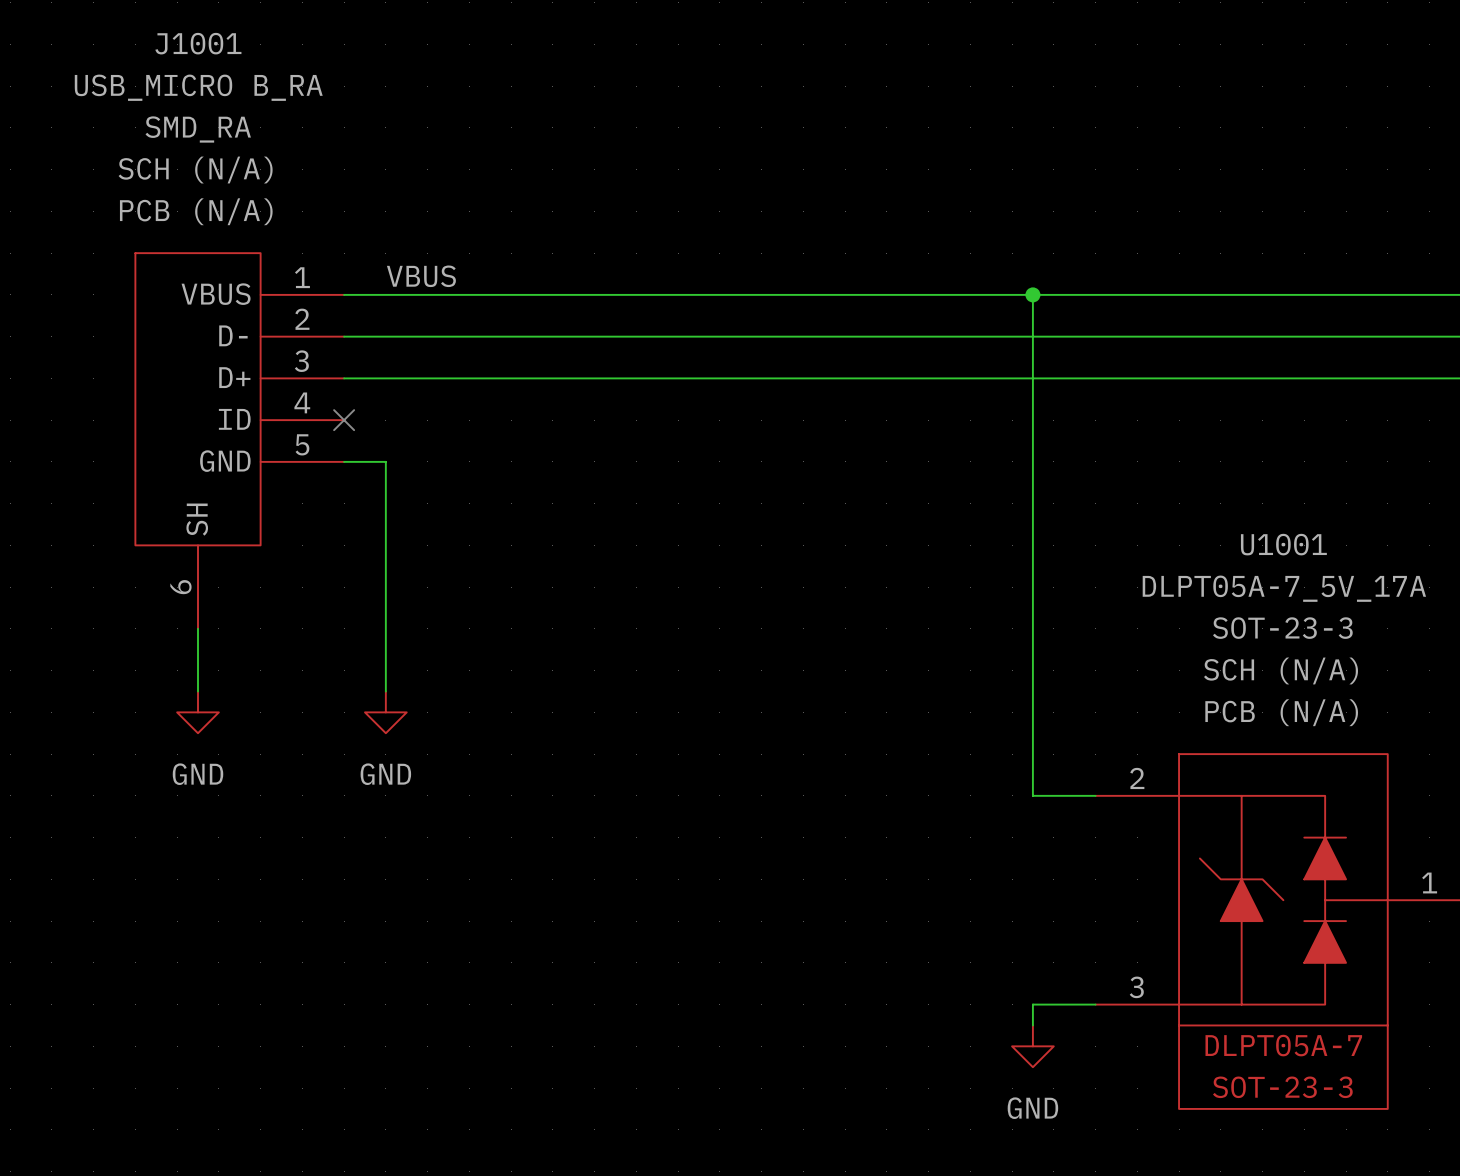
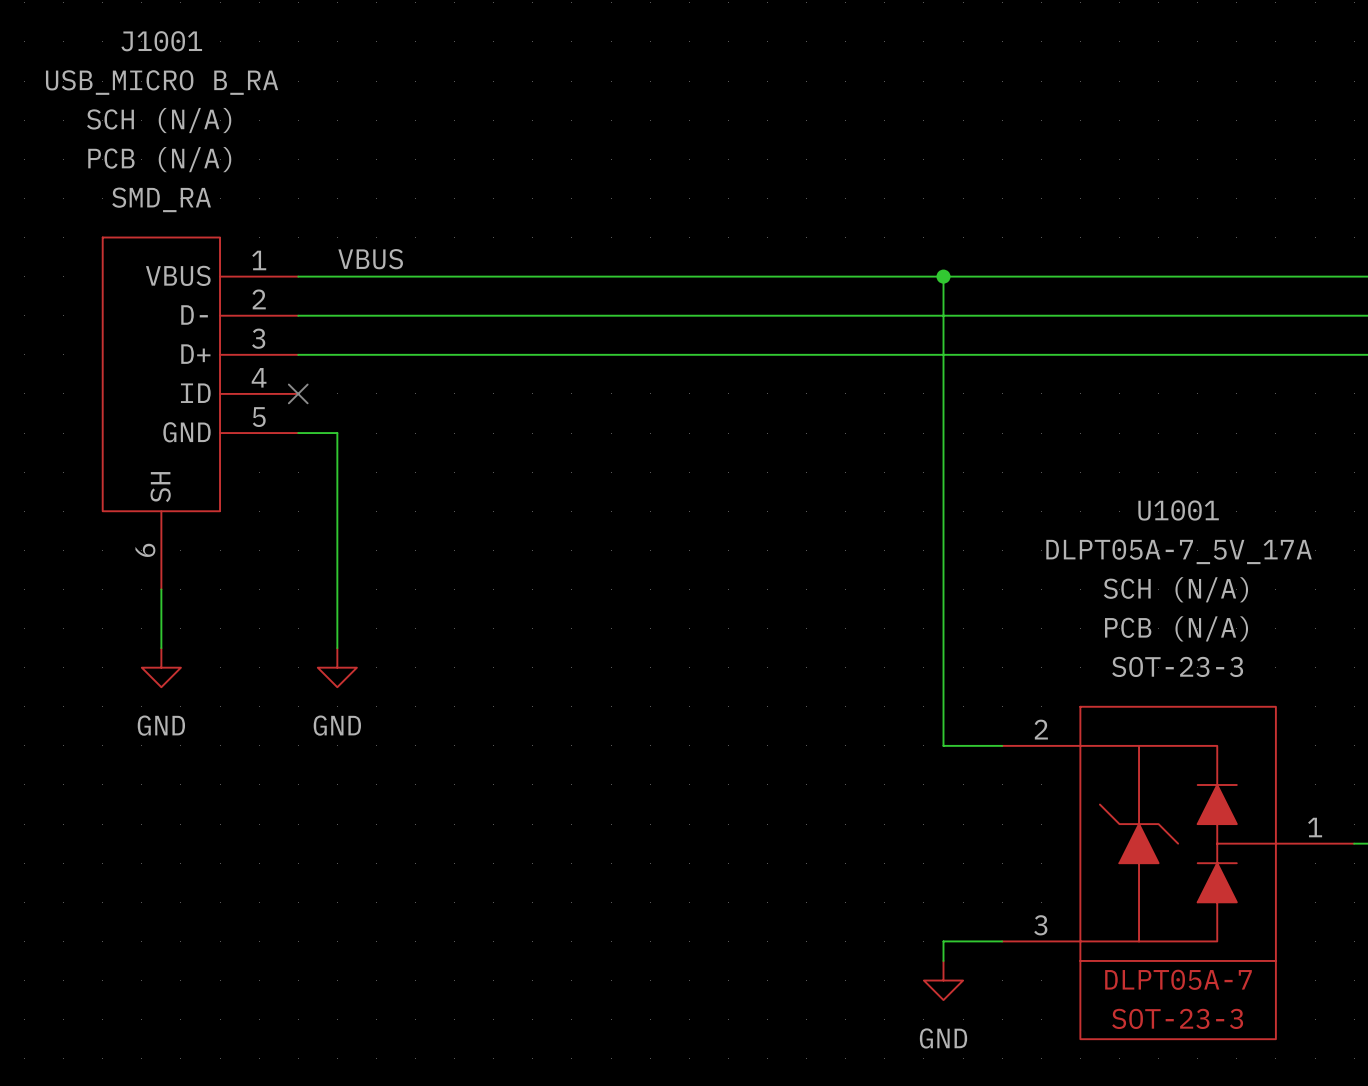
J1001 text position: SMD_RA (198, 129) -> SMD_RA (161, 199)
J1001 text position: SCH (N/A) (195, 170) -> SCH (N/A) (159, 120)
J1001 text position: PCB (N/A) (196, 211) -> PCB (N/A) (159, 159)
U1001 text position: SOT-23-3 (1282, 628) -> SOT-23-3 (1177, 666)
U1001 text position: SCH (N/A) (1281, 670) -> SCH (N/A) (1175, 589)
U1001 text position: PCB (N/A) (1281, 712) -> PCB (N/A) (1176, 628)

